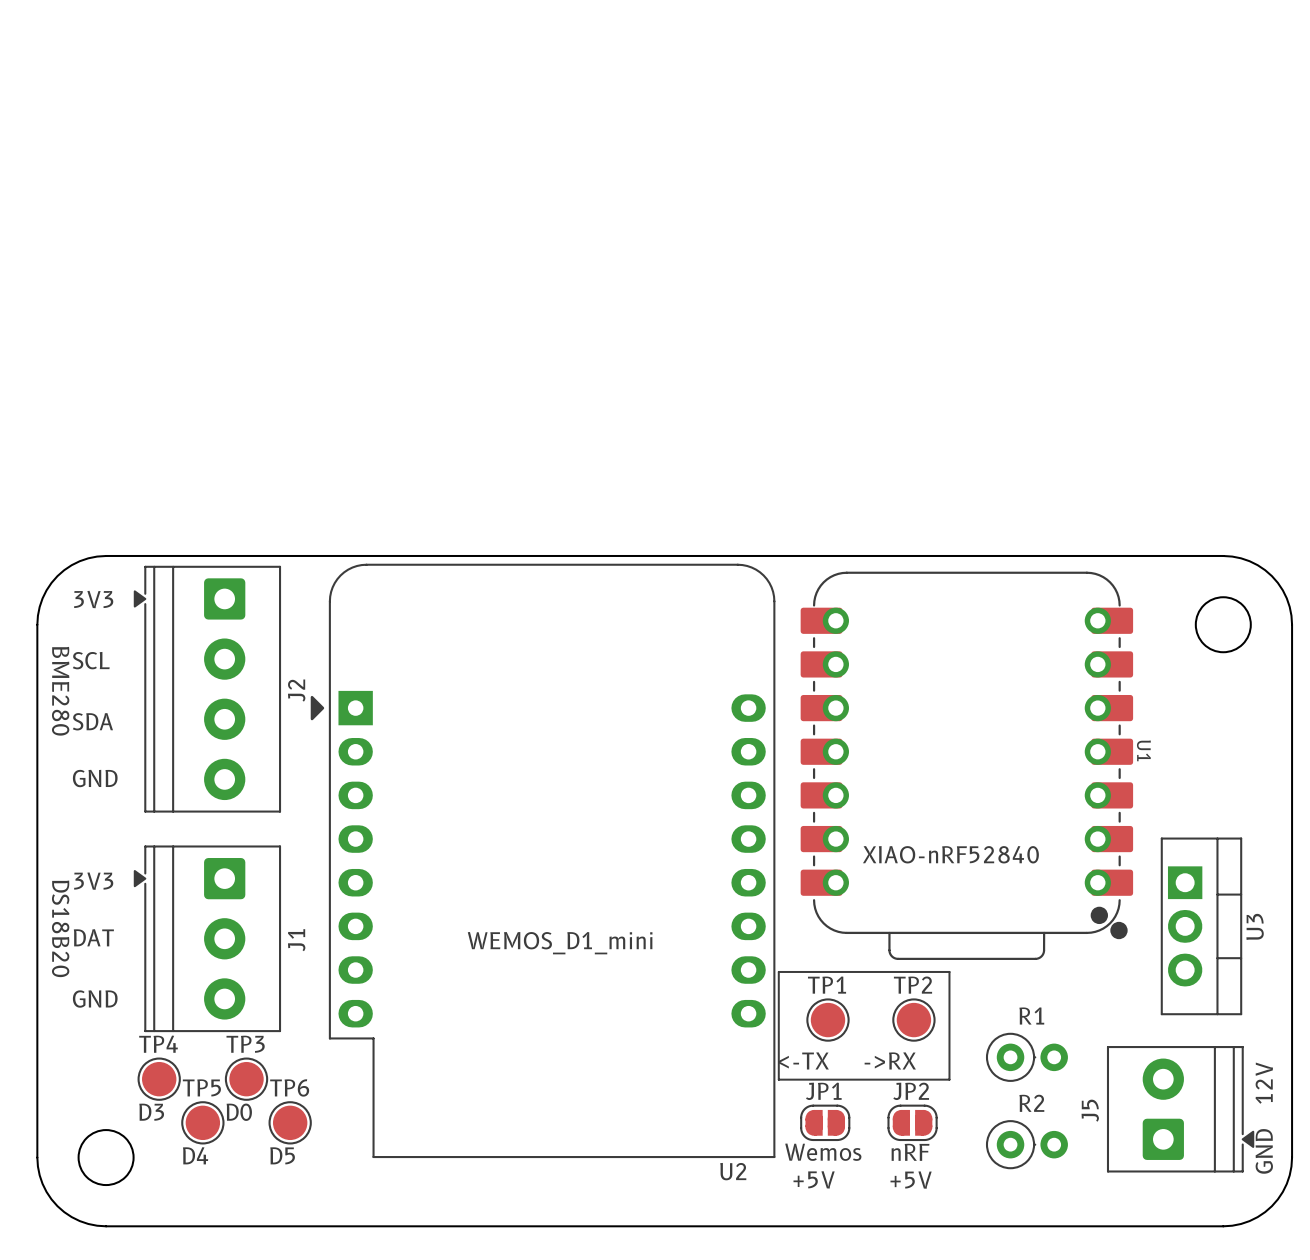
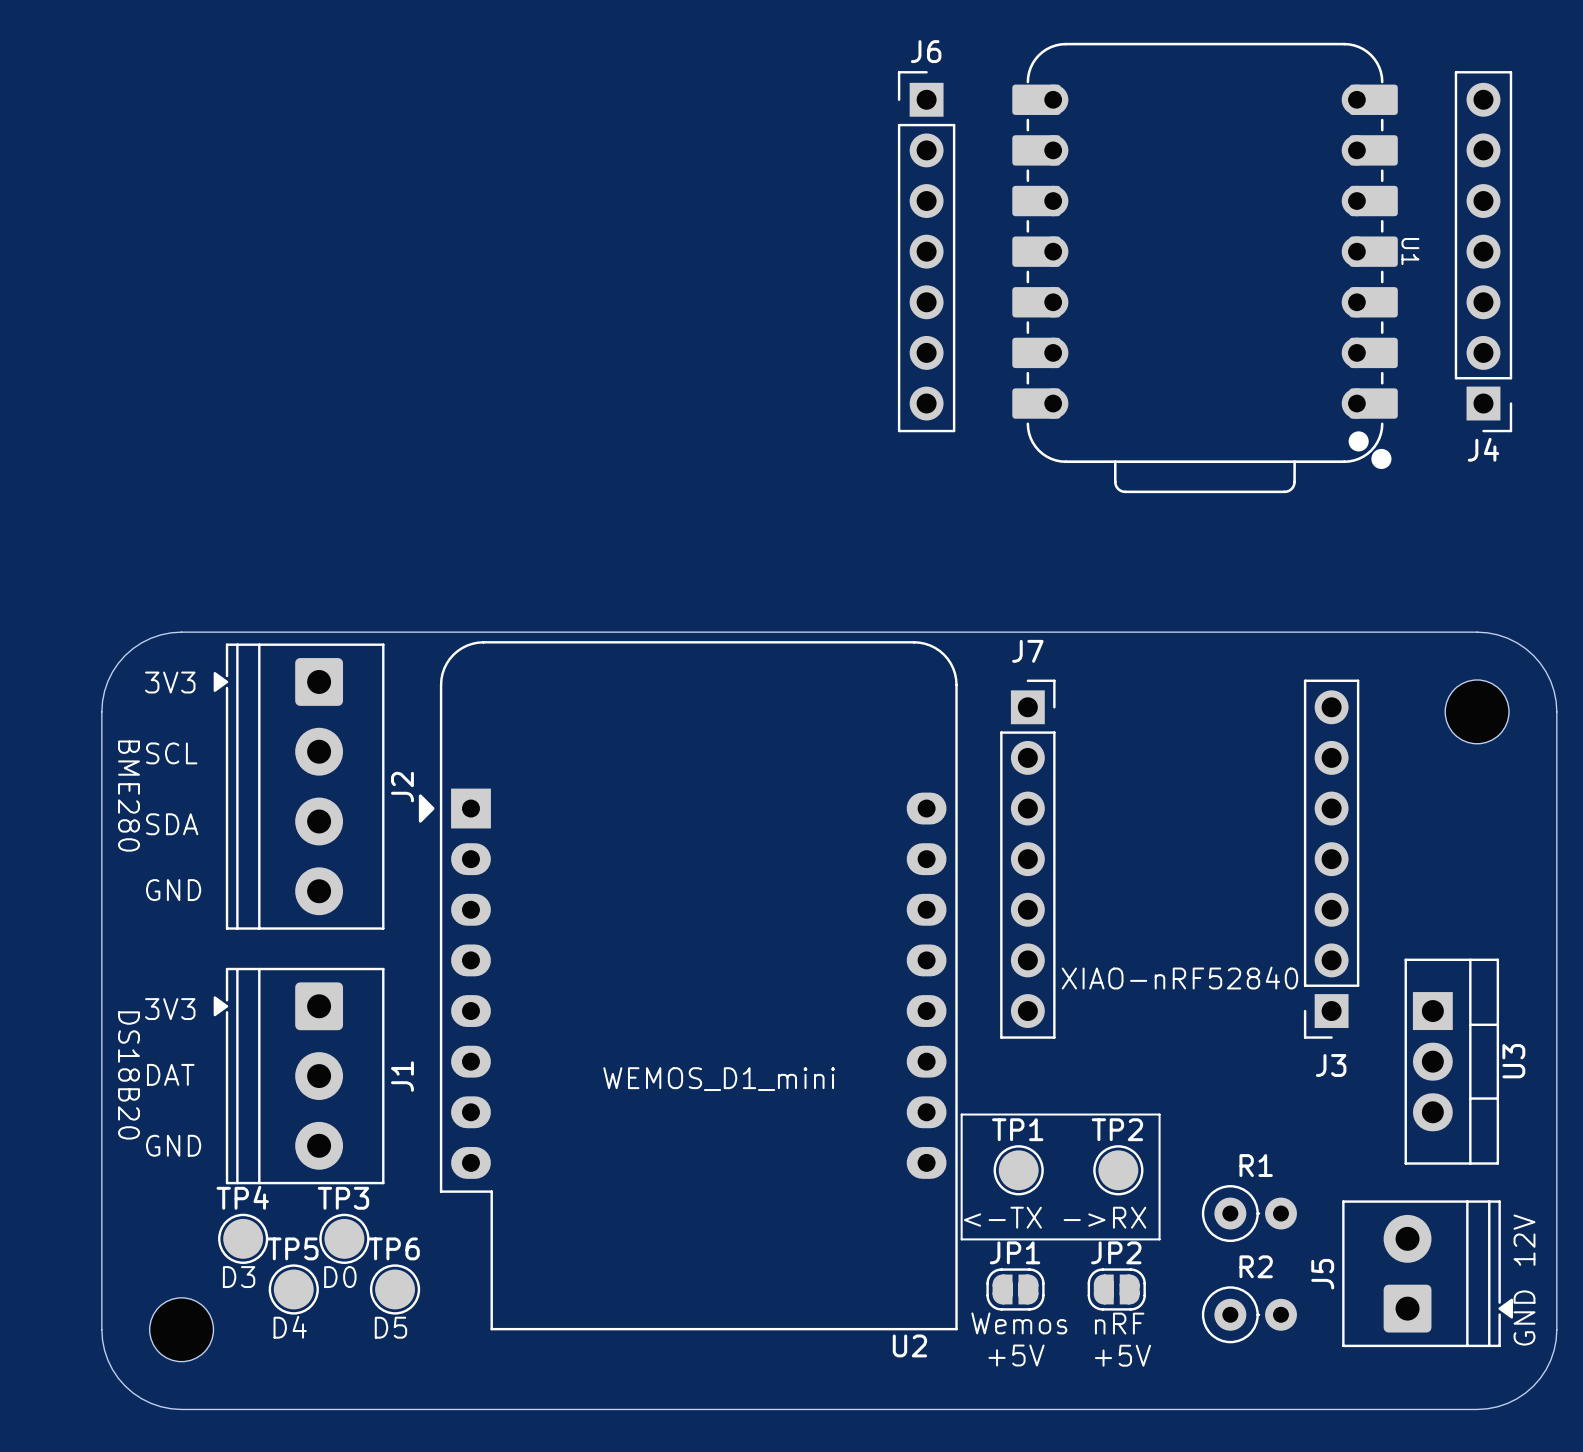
J6: none -> (926, 251)
J4: none -> (1483, 251)
J7: none -> (1027, 859)
J3: none -> (1331, 859)
U1 position: (966, 765) -> (1205, 267)

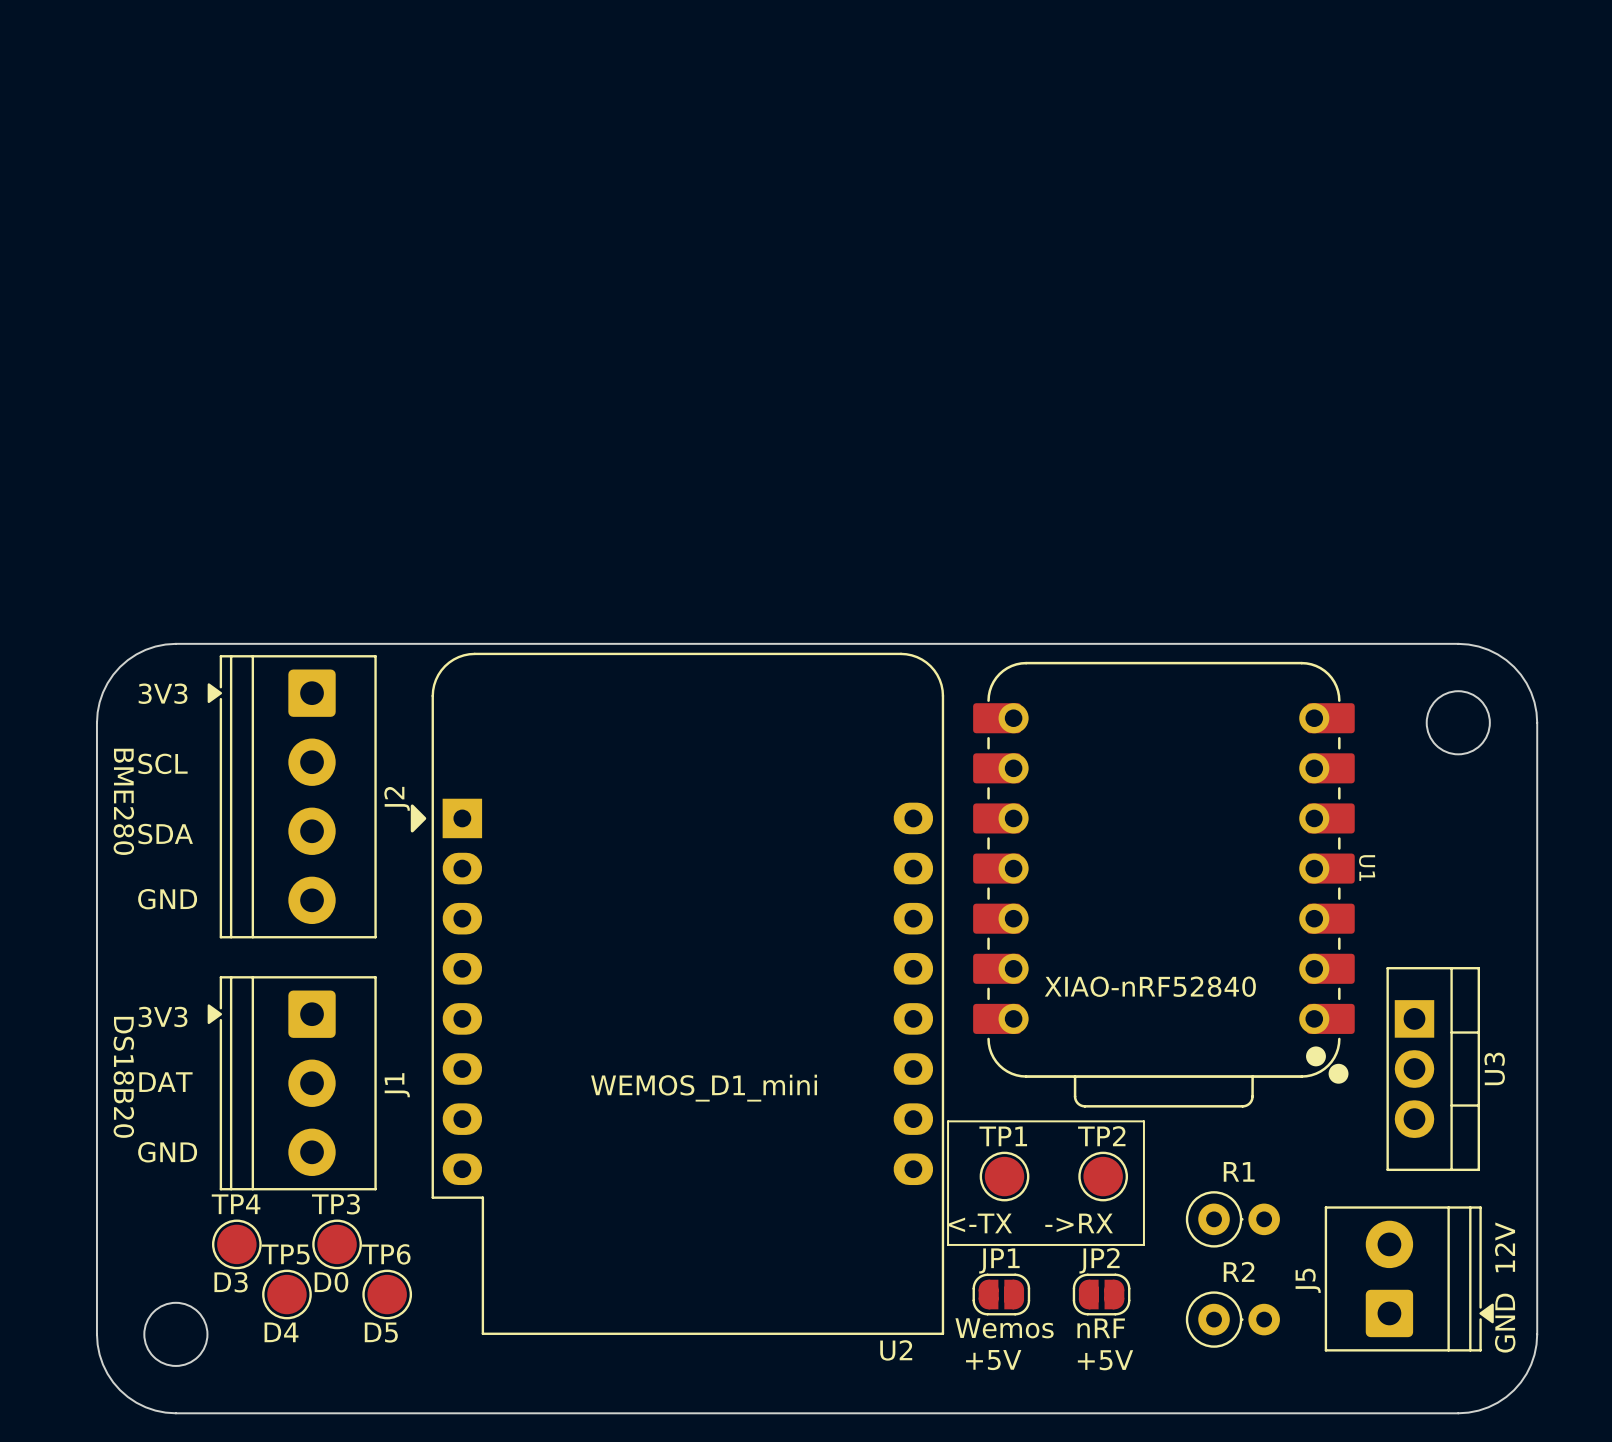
J6: (926, 251) -> none
J4: (1483, 251) -> none
U1 position: (1205, 267) -> (1163, 884)
J7: (1027, 859) -> none
J3: (1331, 859) -> none

